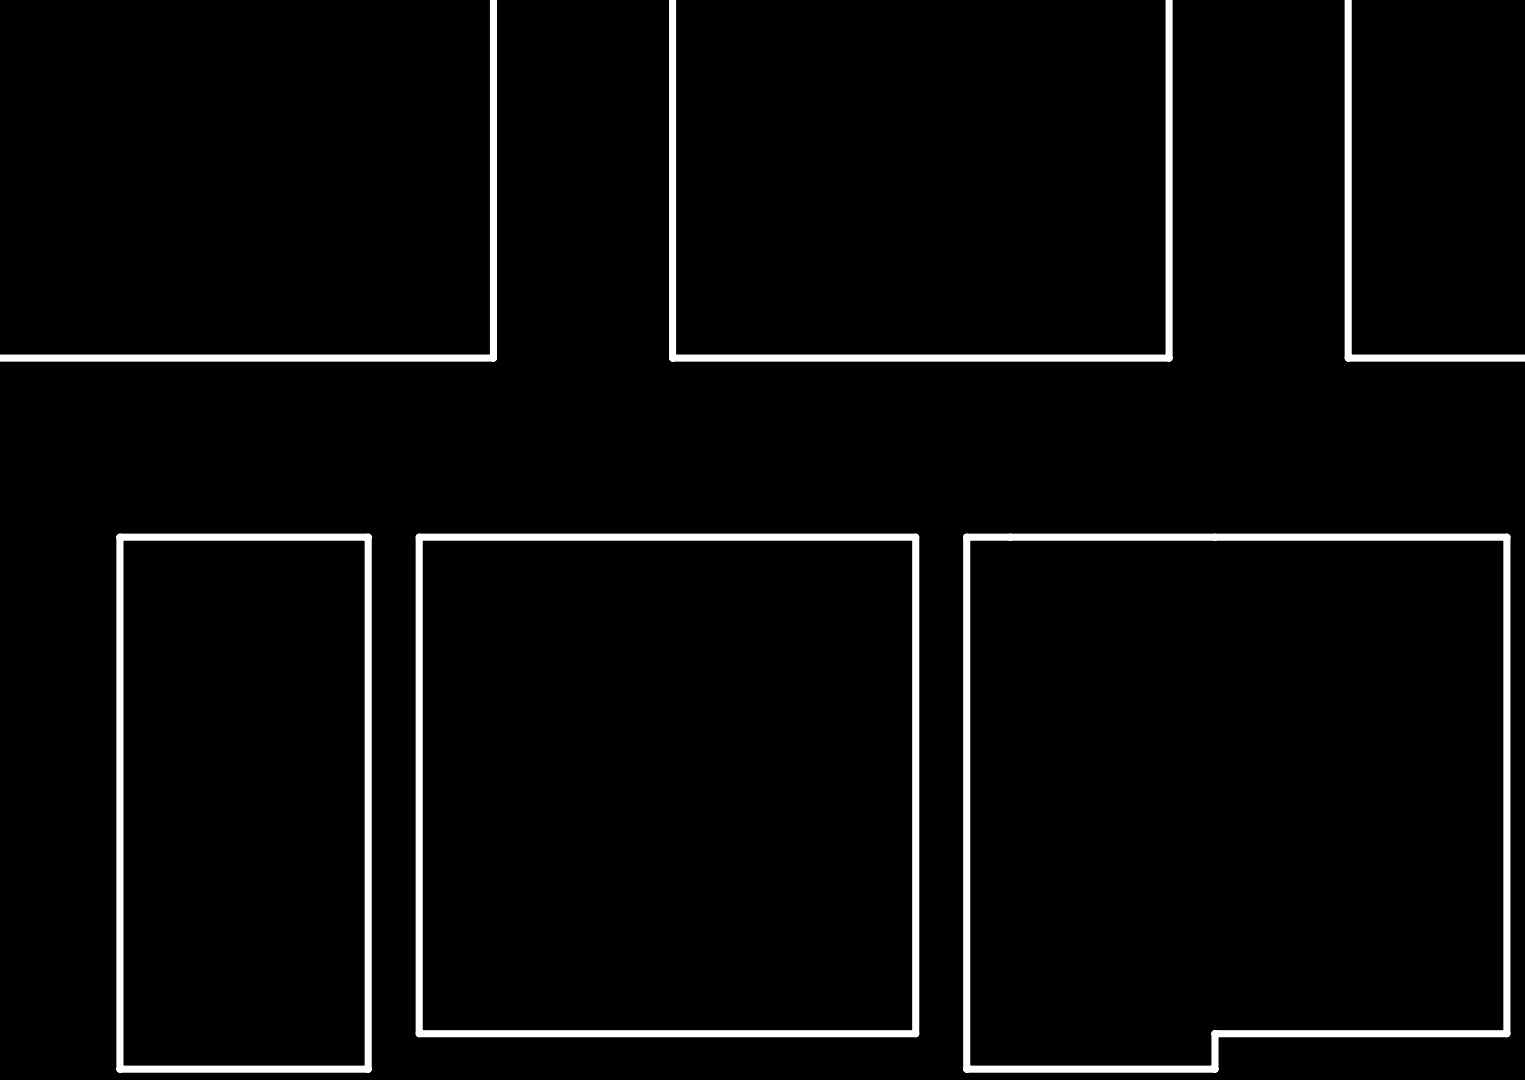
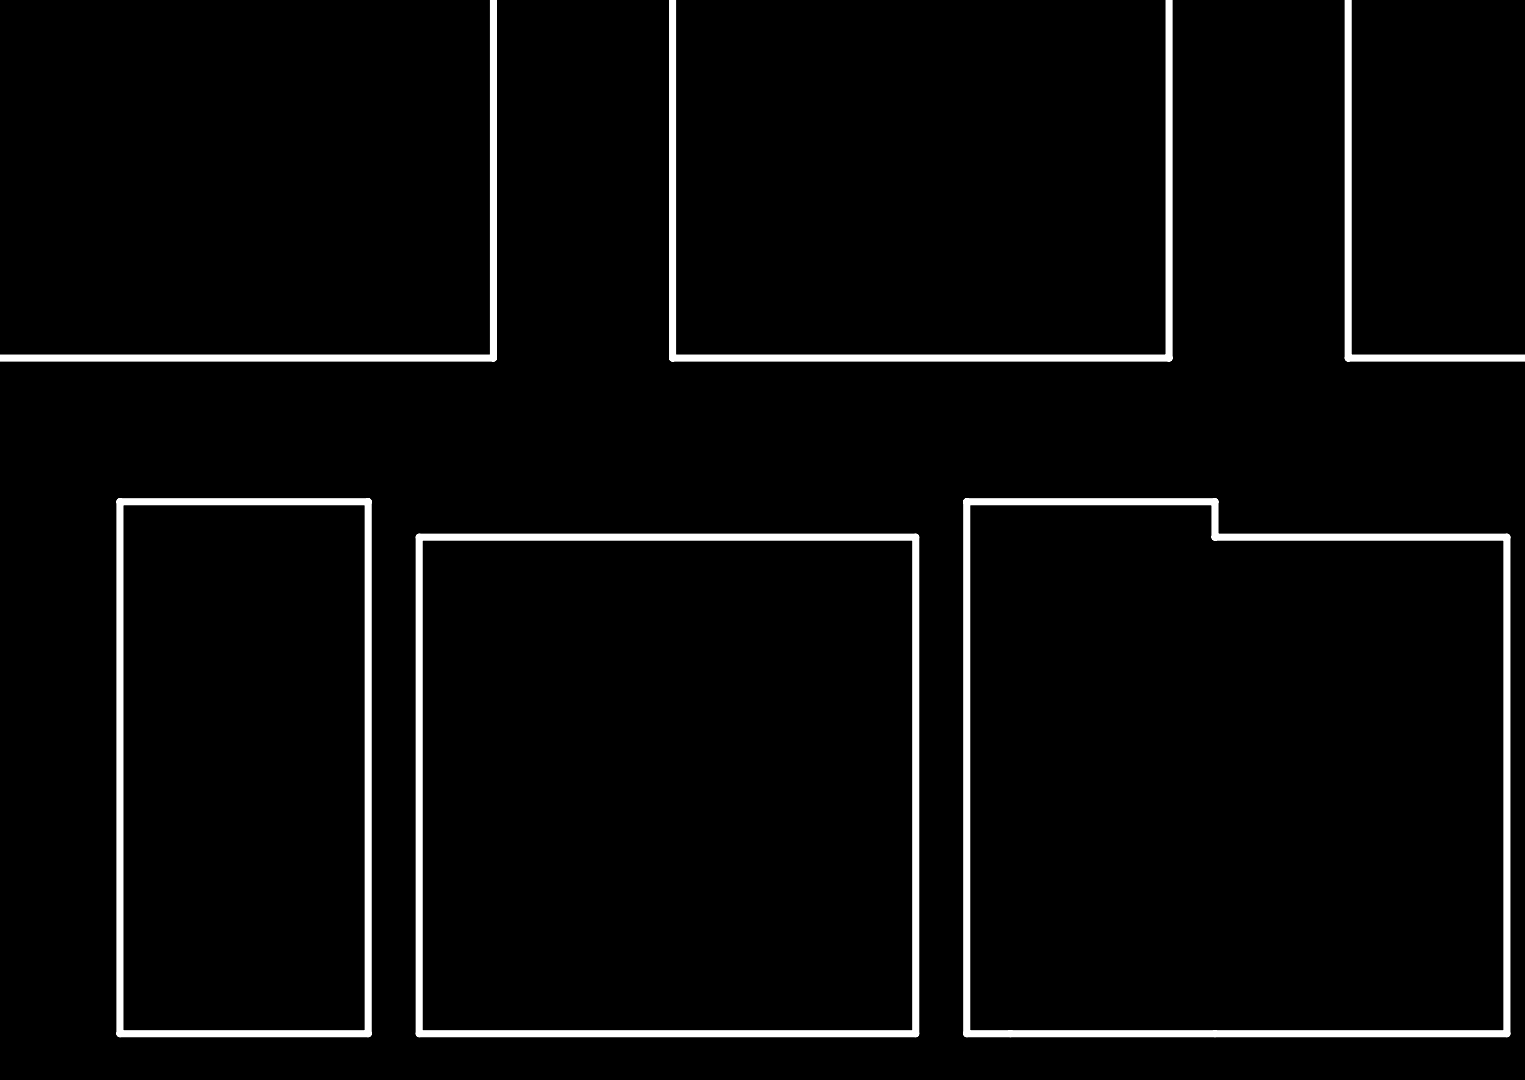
board edge: (368, 537) (119, 537) -> (368, 537) (368, 501) (119, 501) (119, 537)
board edge: (1214, 537) (966, 537) -> (1214, 537) (1214, 501) (966, 501) (966, 537)
board edge: (368, 1033) (368, 1069) (119, 1069) (119, 1033) -> (368, 1033) (119, 1033)
board edge: (1214, 1033) (1214, 1069) (966, 1069) (966, 1033) -> (1214, 1033) (966, 1033)

